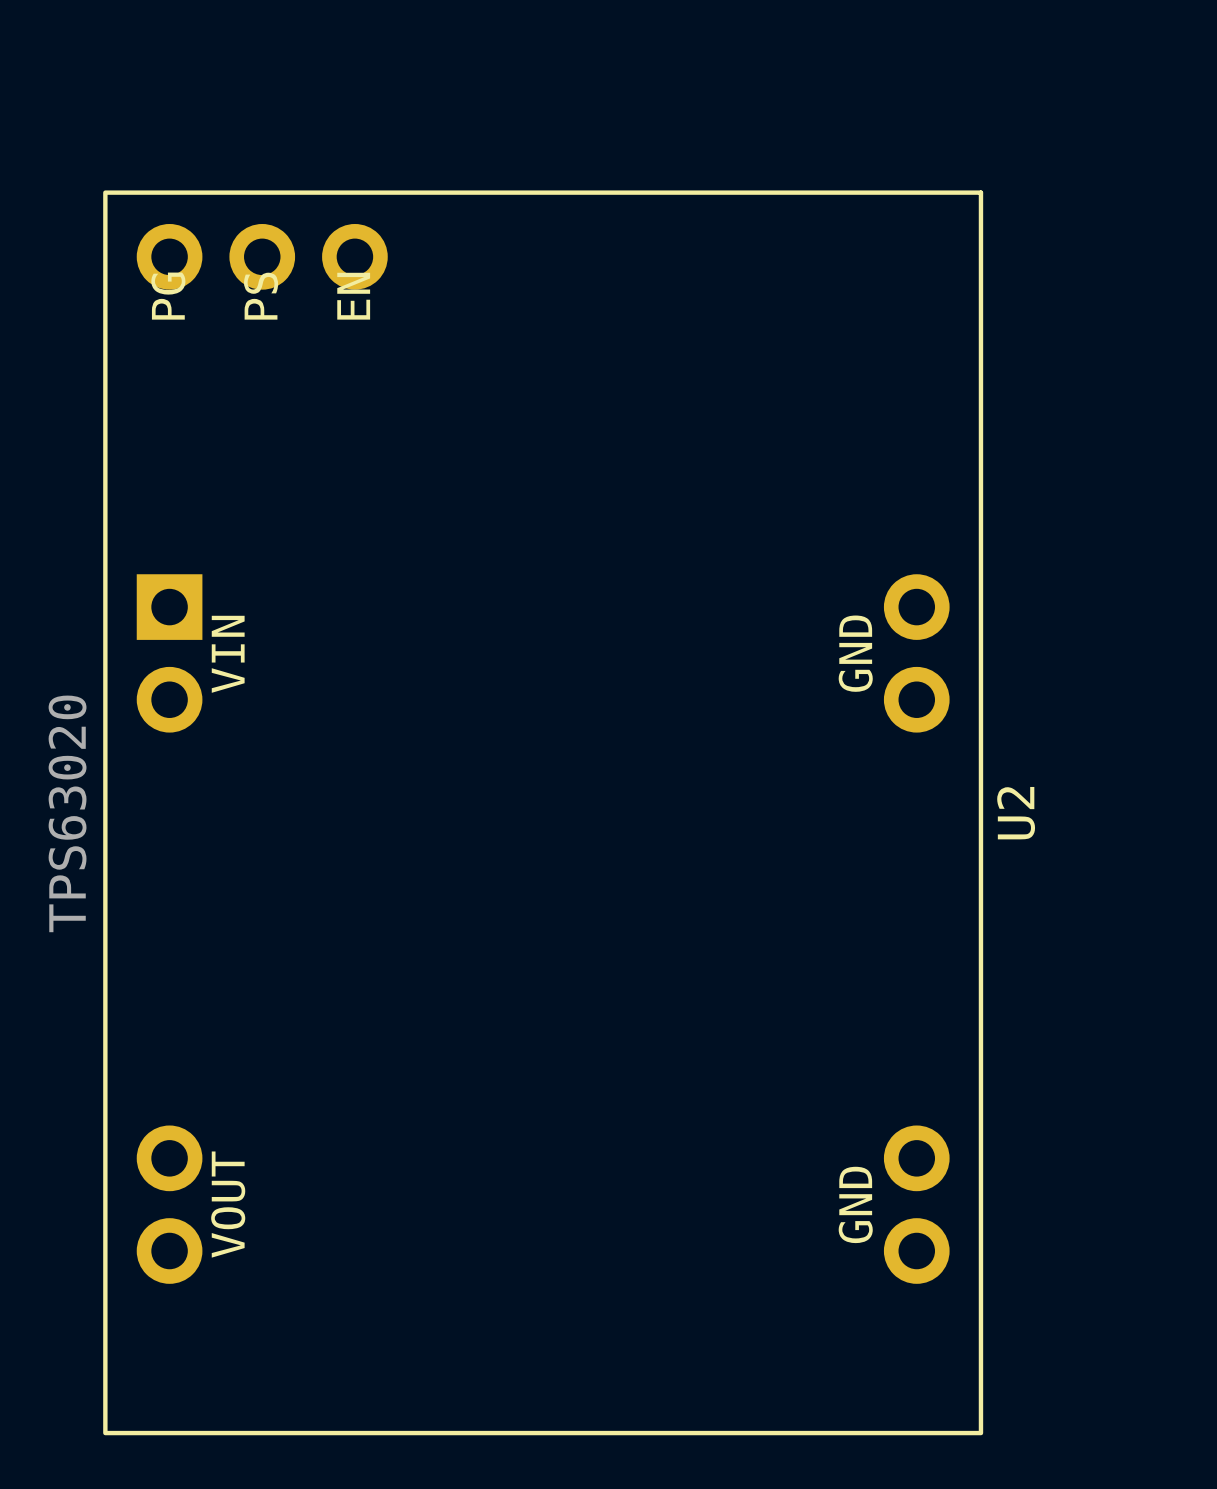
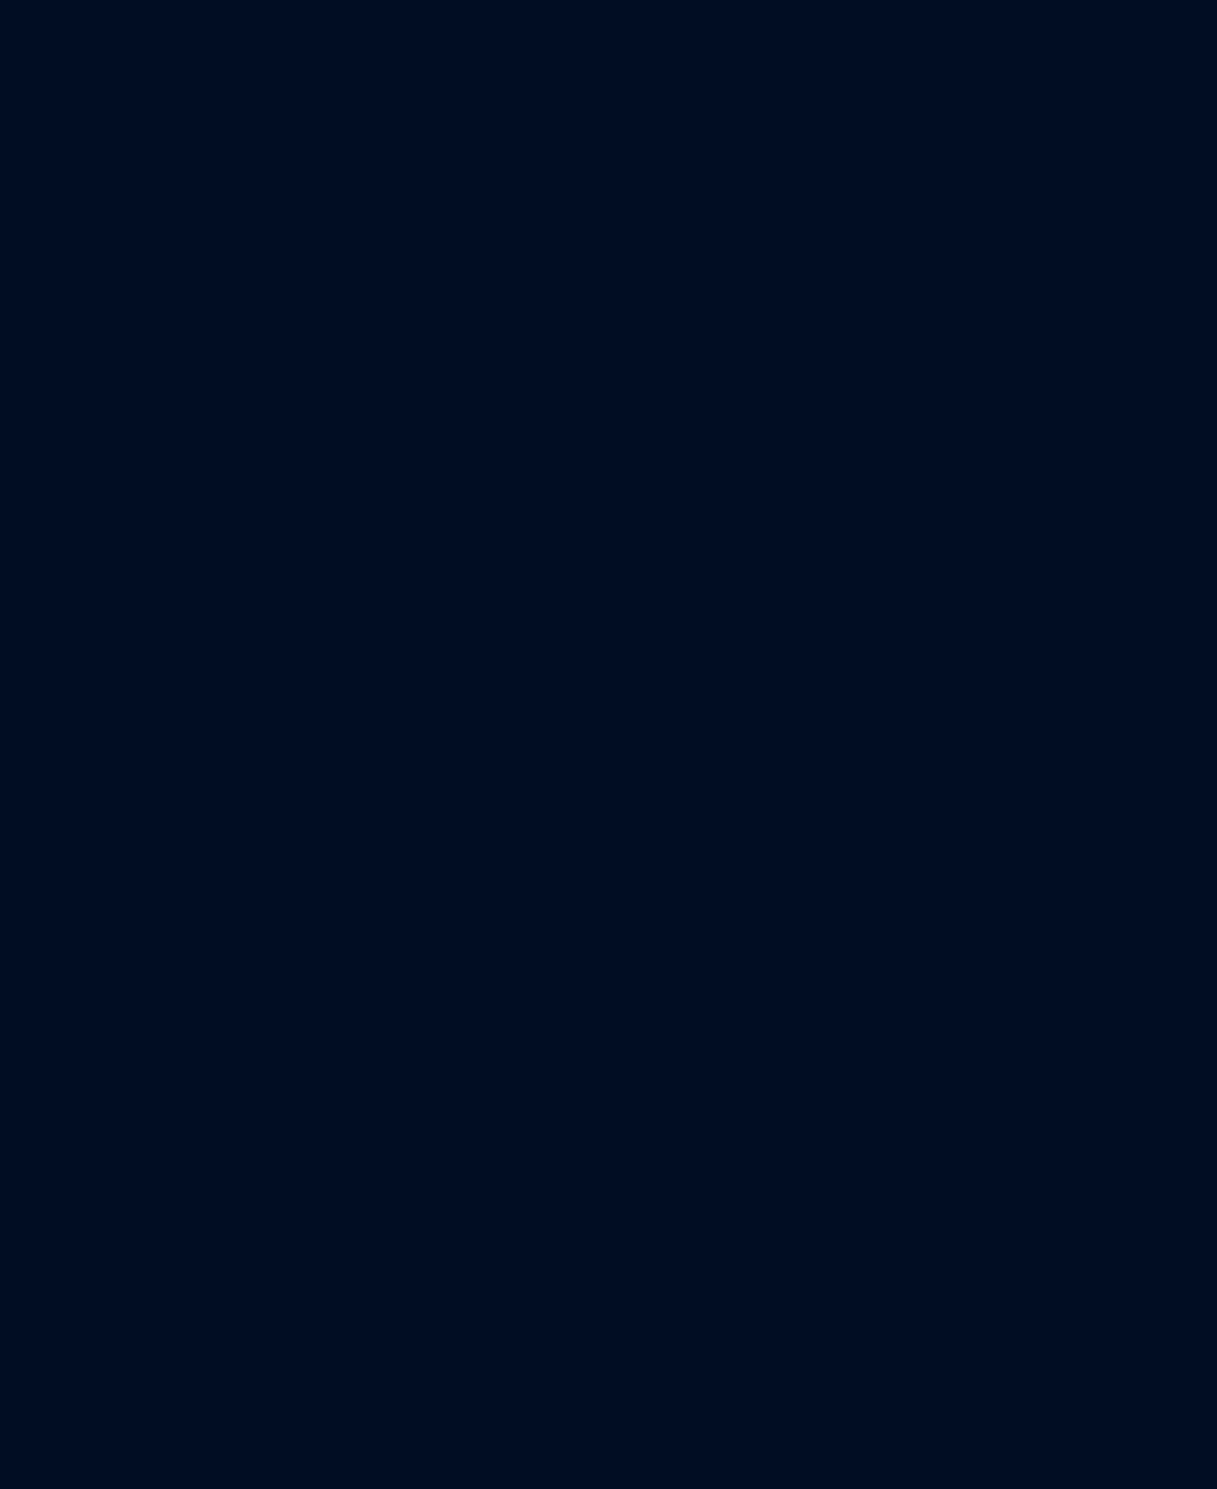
U2: TPS63020 (543, 812) -> none

